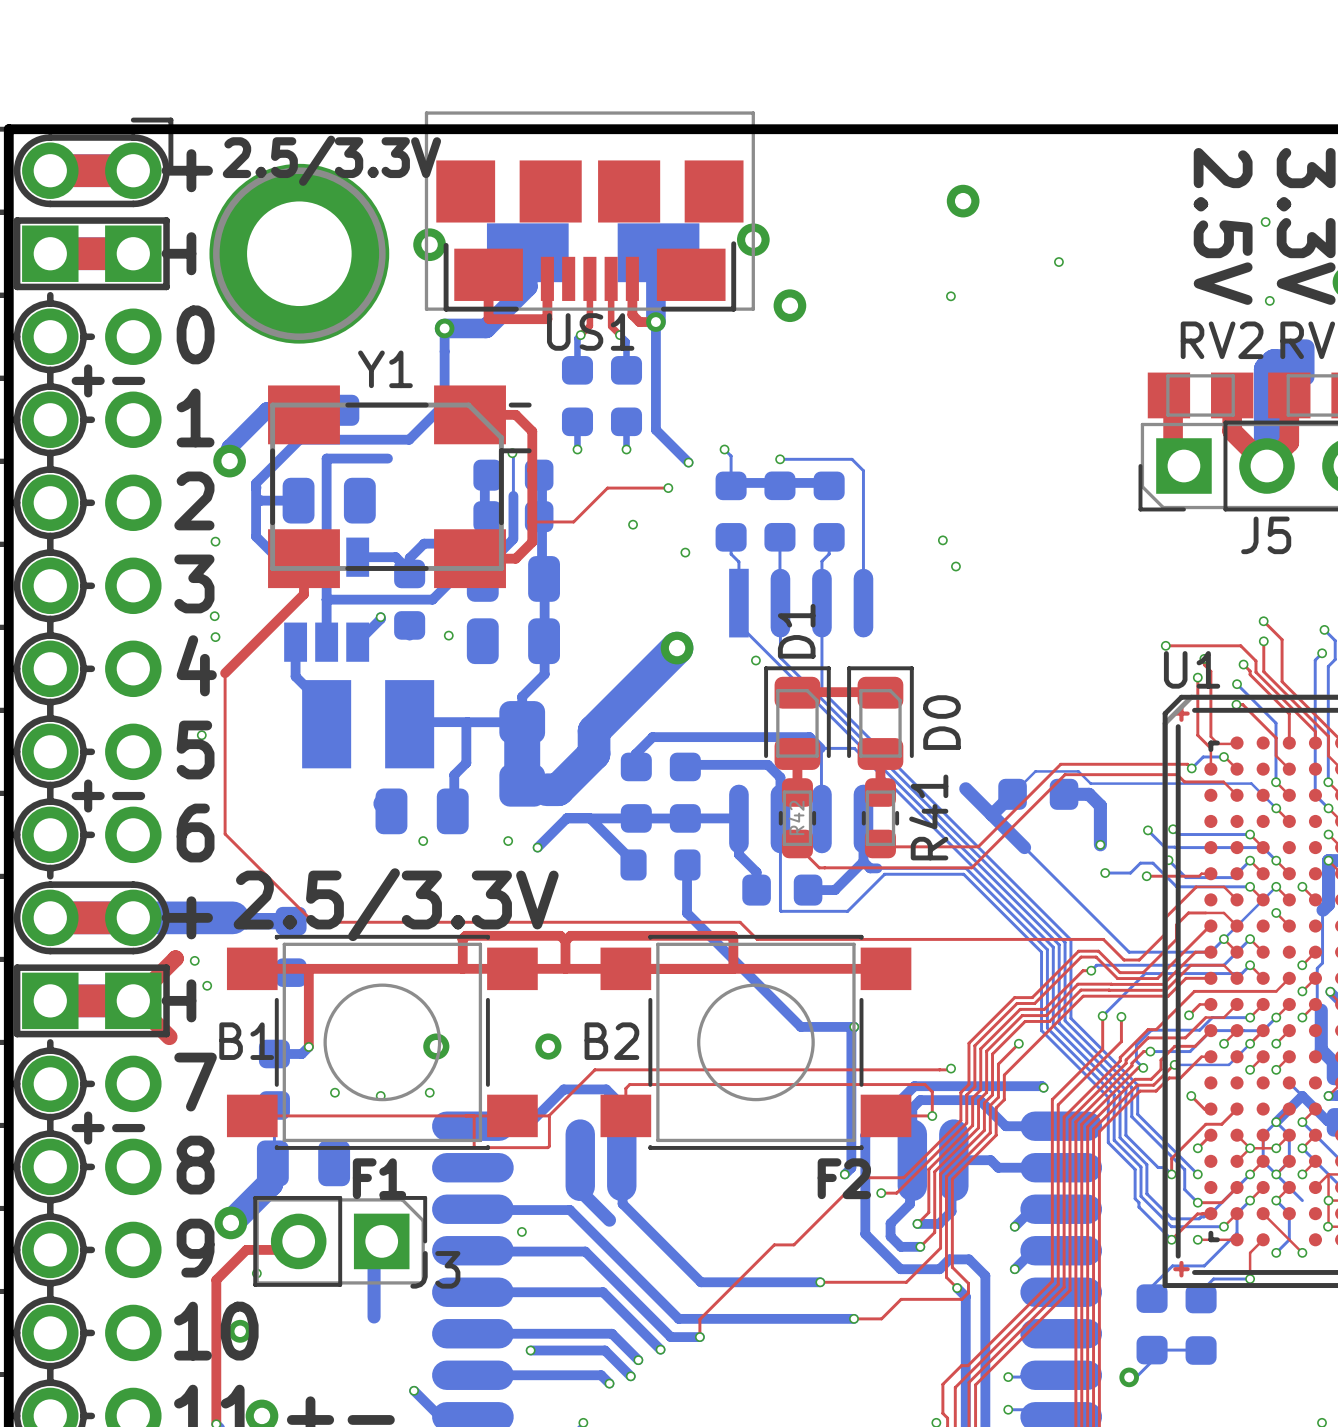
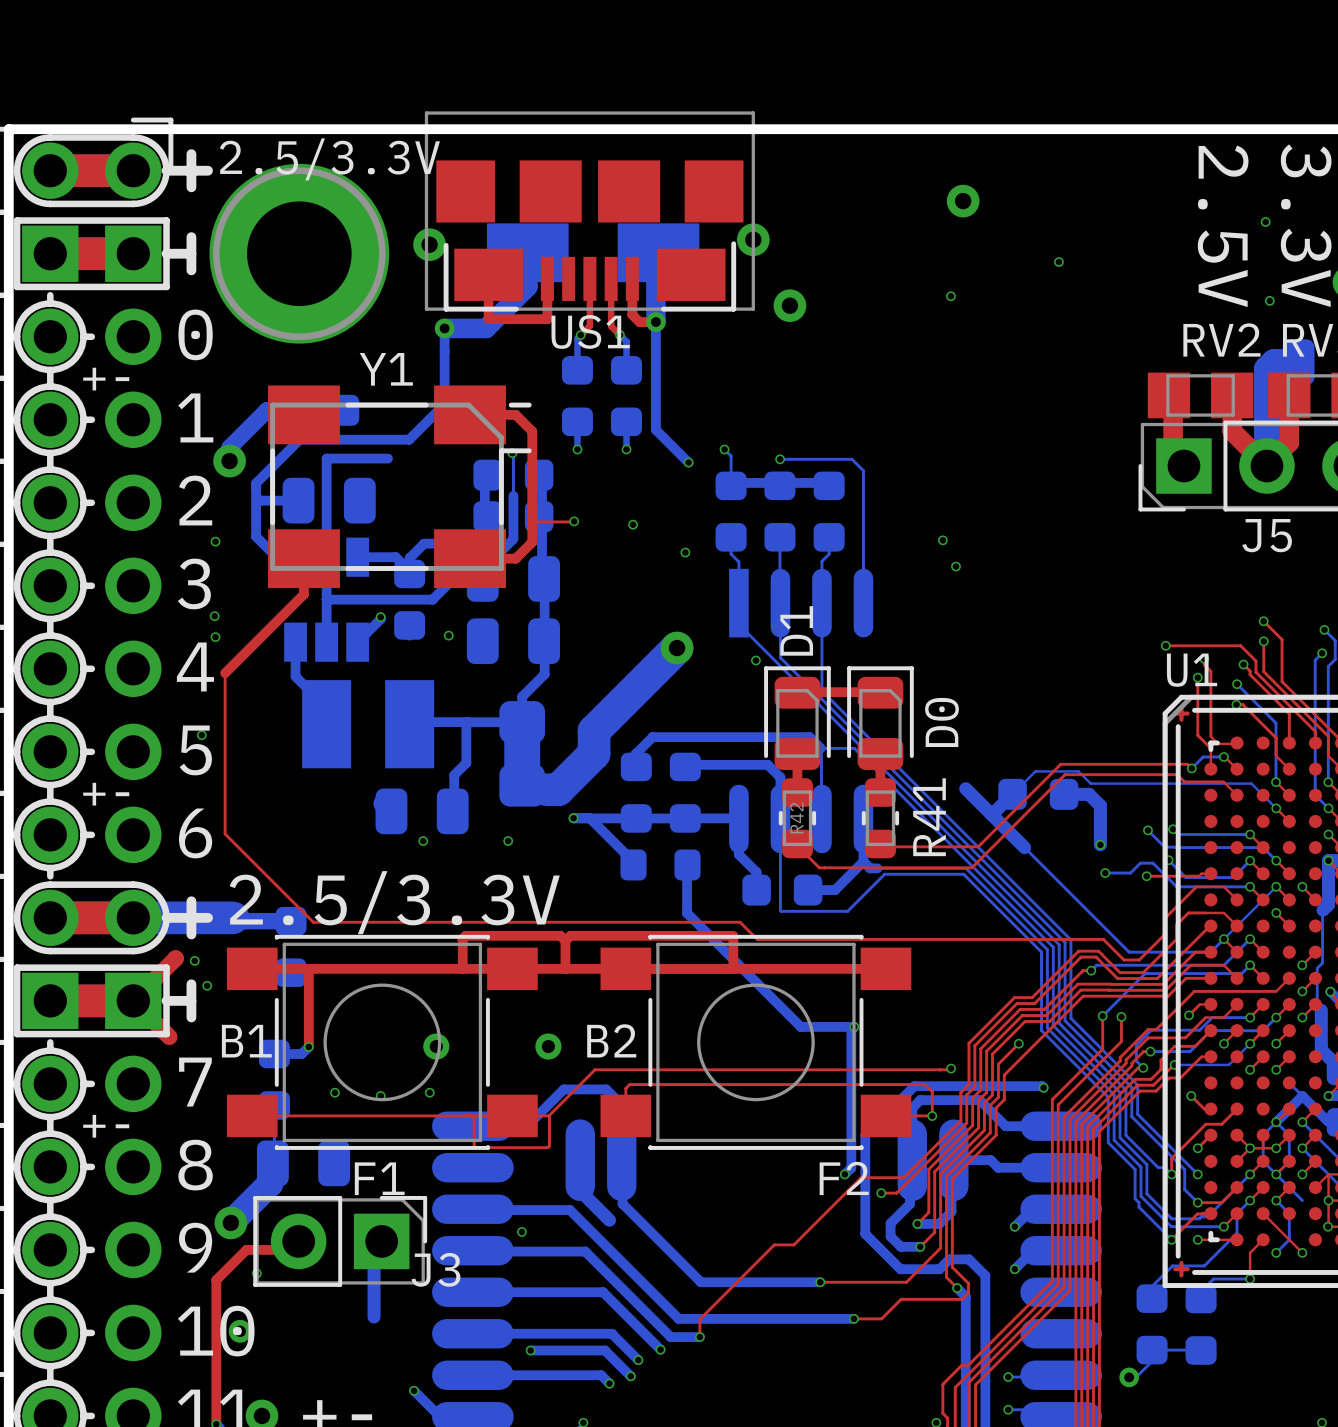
top track: (668, 488) (607, 488) (574, 521) -> none
via position: (668, 488) -> (574, 521)
bottom track: (573, 818) (567, 818) (537, 847) -> none
via position: (537, 847) -> (573, 818)

